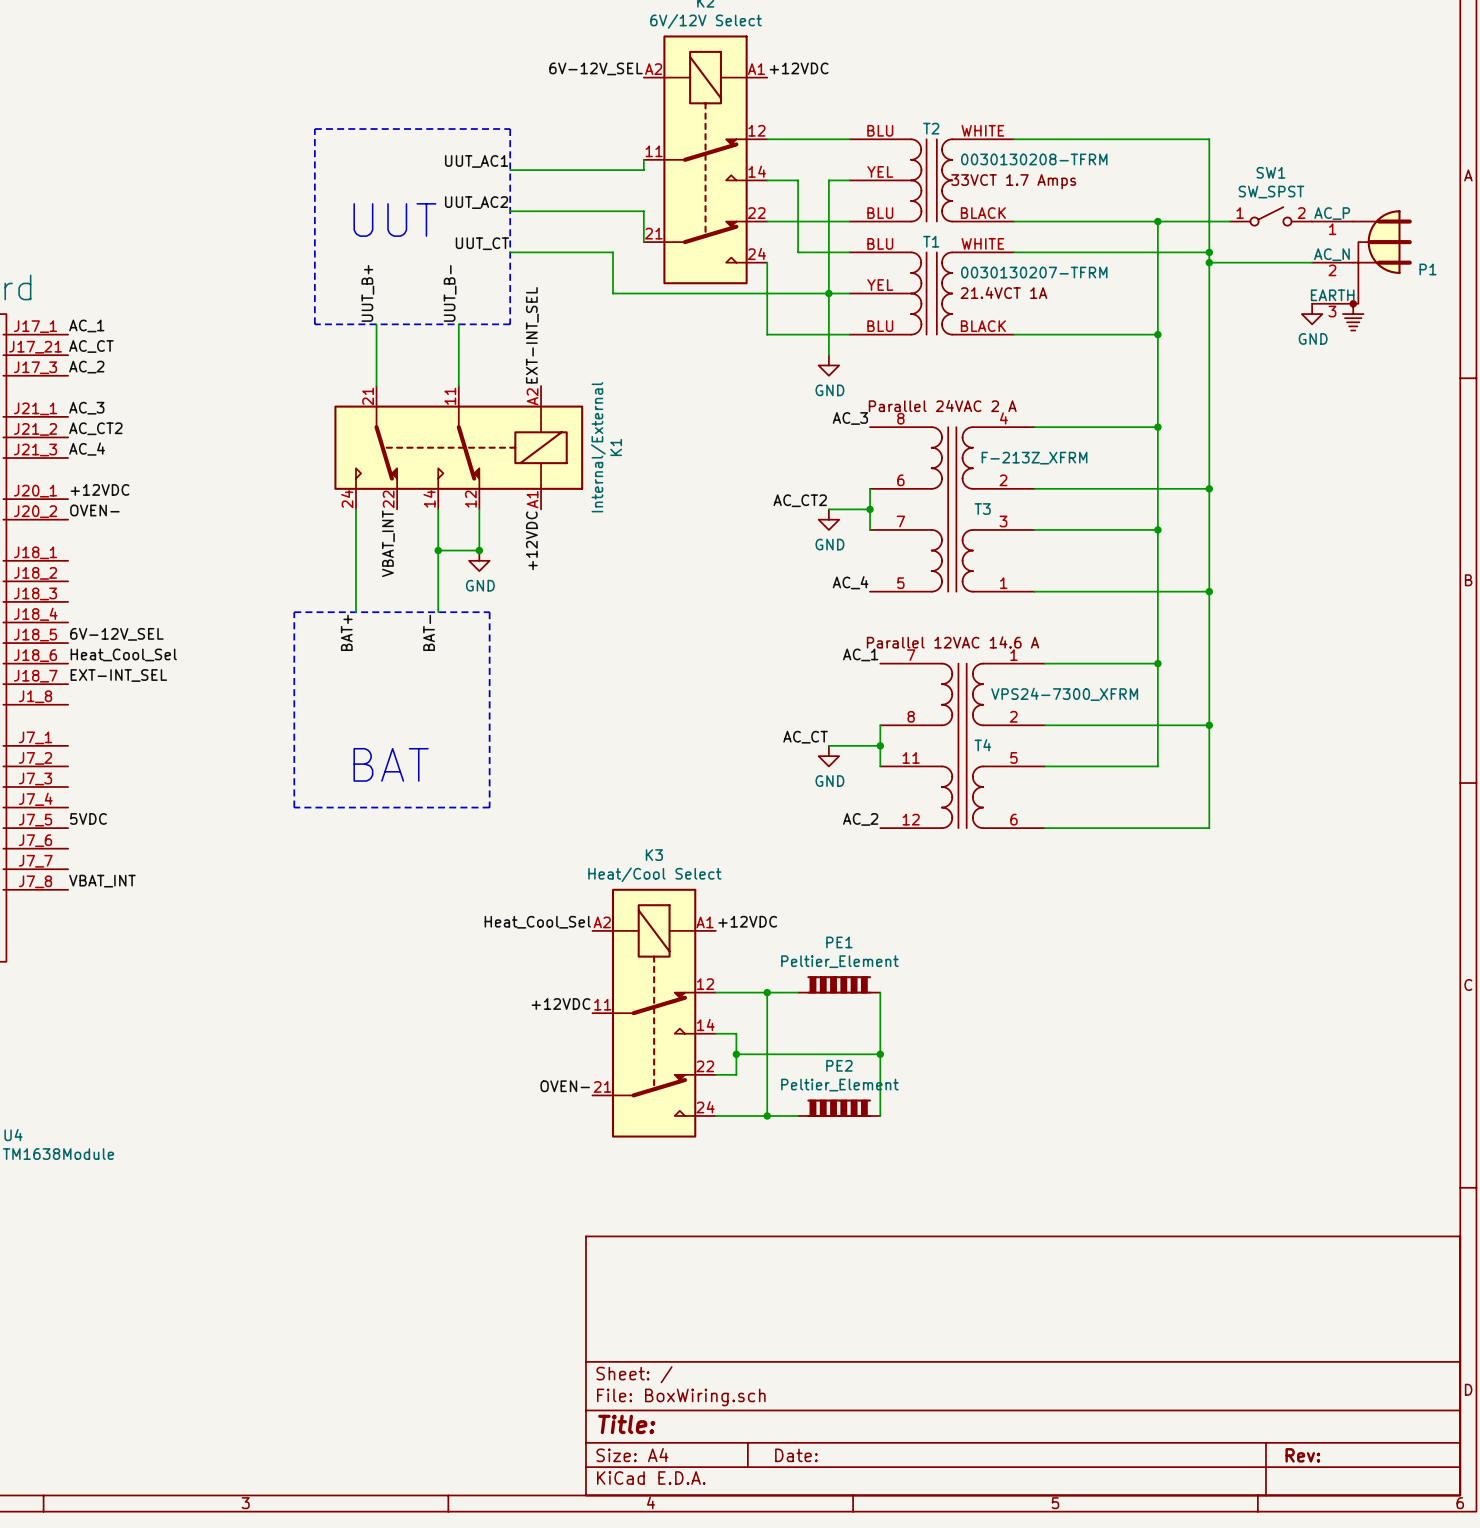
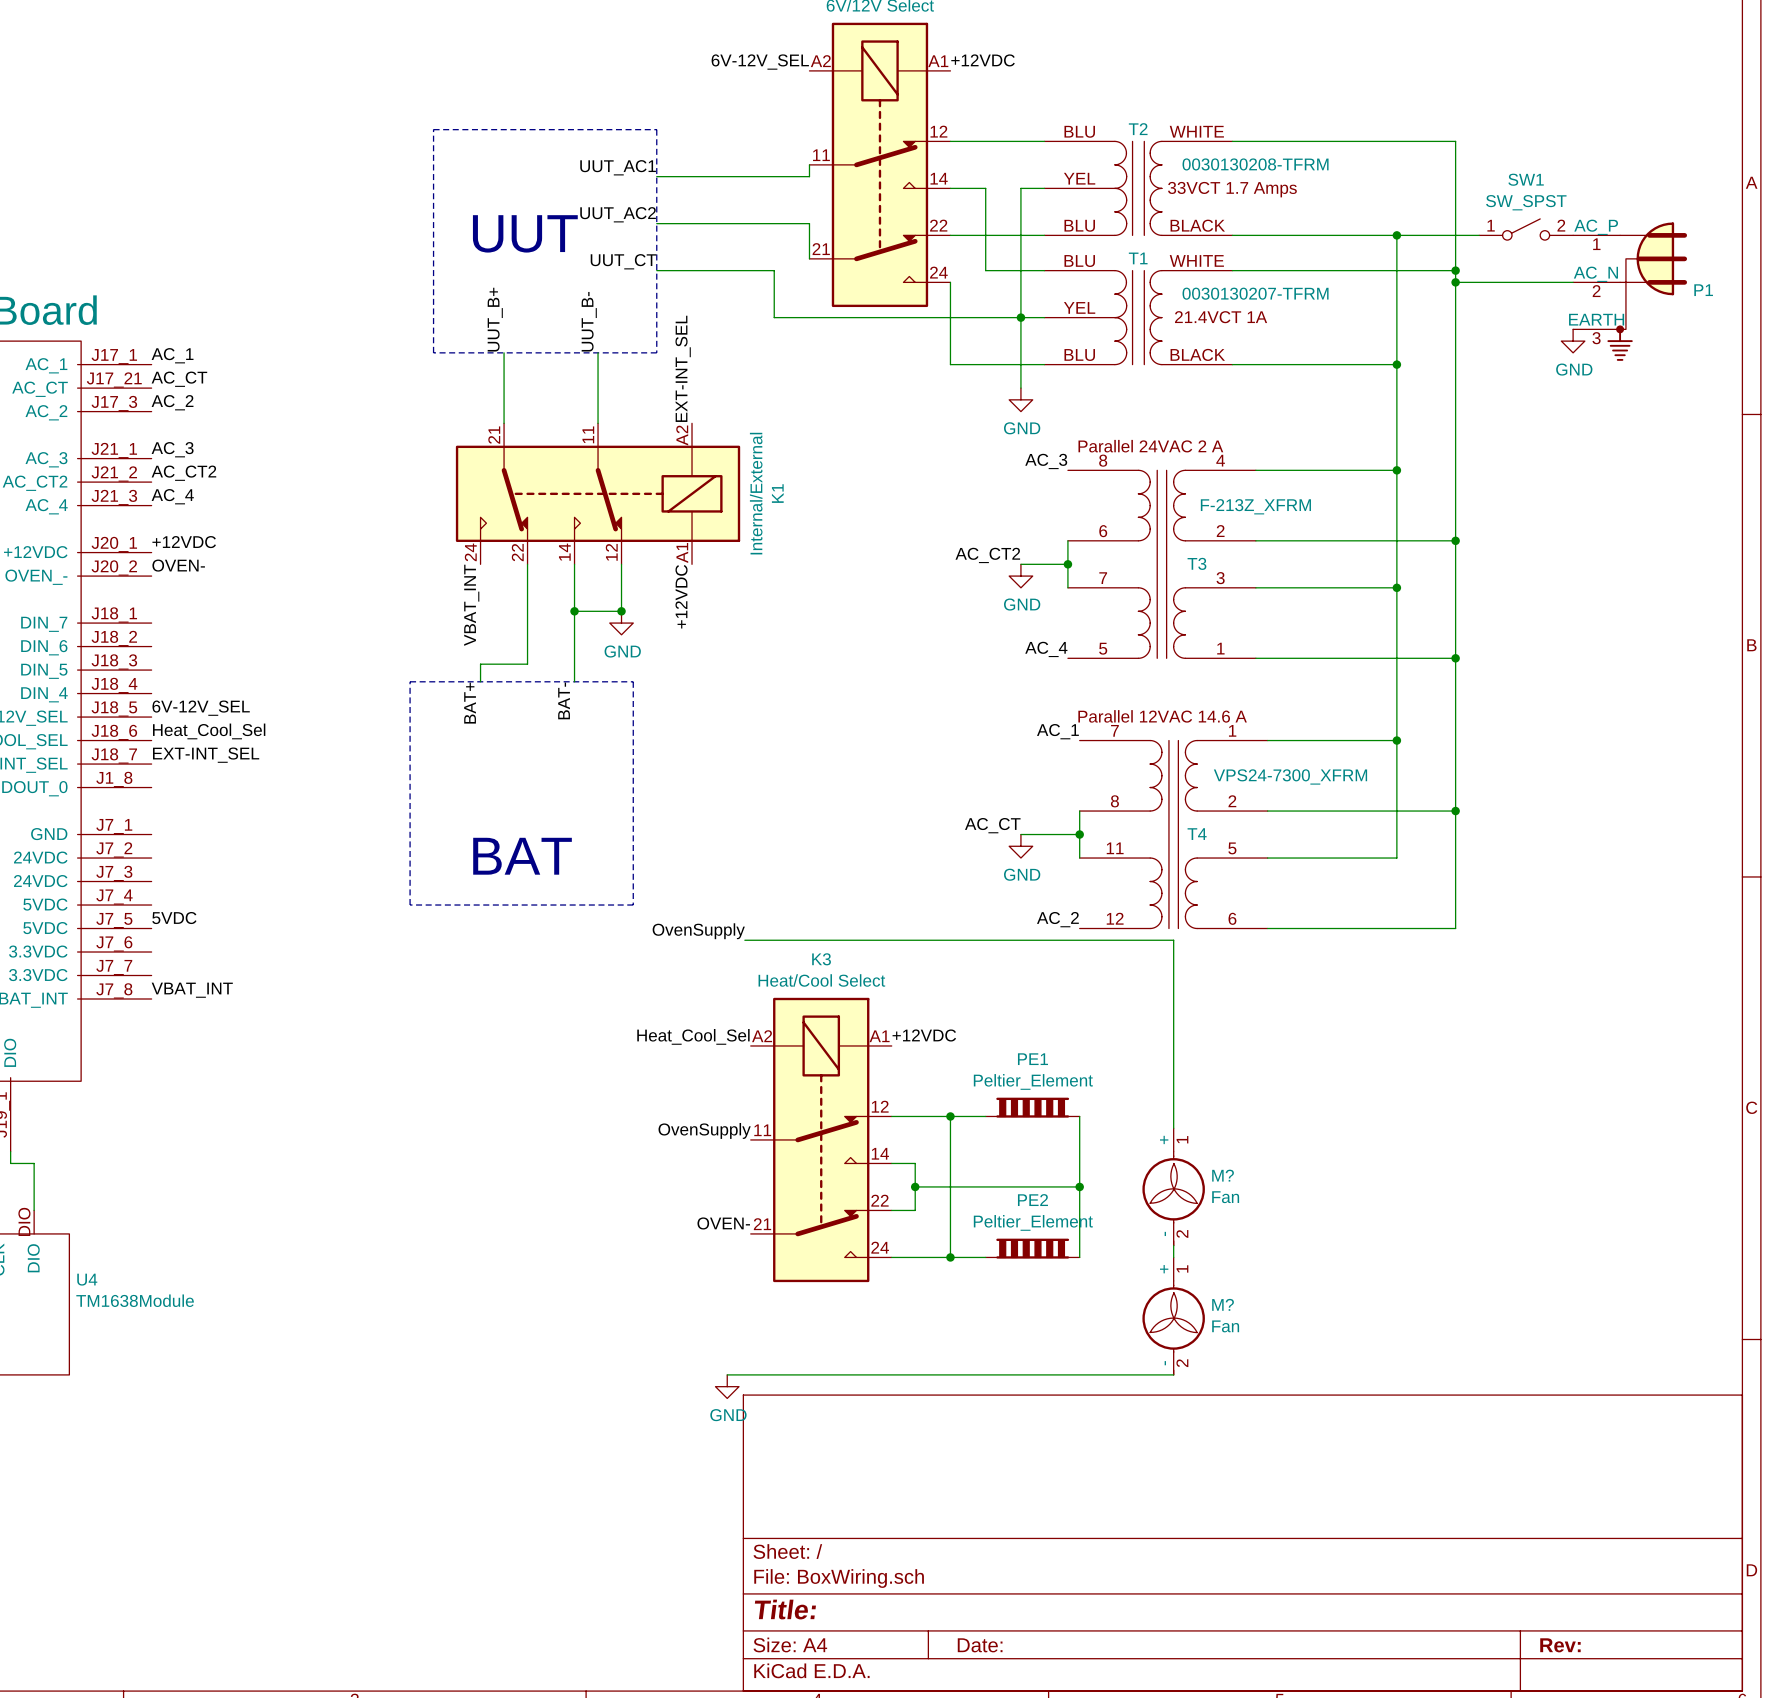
wire: (355, 509) (355, 596) -> (527, 564) (527, 664) (480, 664)
label position: VBAT_INT (388, 543) -> VBAT_INT (471, 605)
label: none -> OvenSupply (698, 931)
wire: none -> (744, 940) (1173, 940) (1173, 1128)
label: +12VDC (561, 1004) -> OvenSupply (704, 1130)
M?: none -> Fan (1173, 1186)
wire: none -> (1173, 1245) (1173, 1257)
M?: none -> Fan (1173, 1316)
wire: none -> (727, 1374) (1173, 1374)
power symbol: none -> GND (727, 1386)

